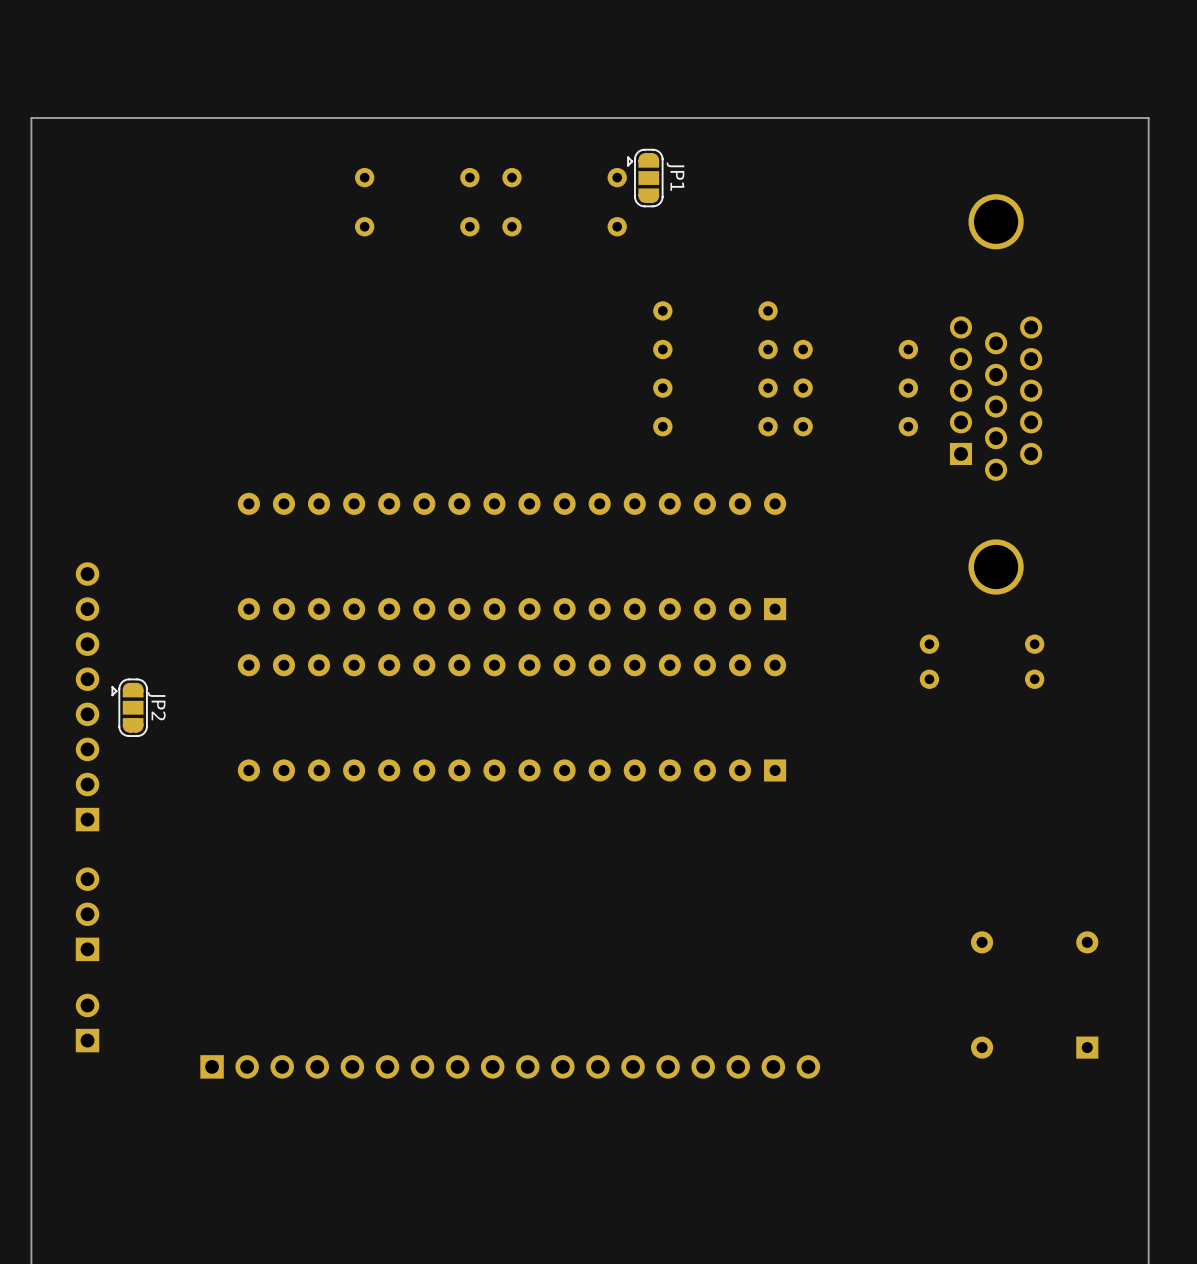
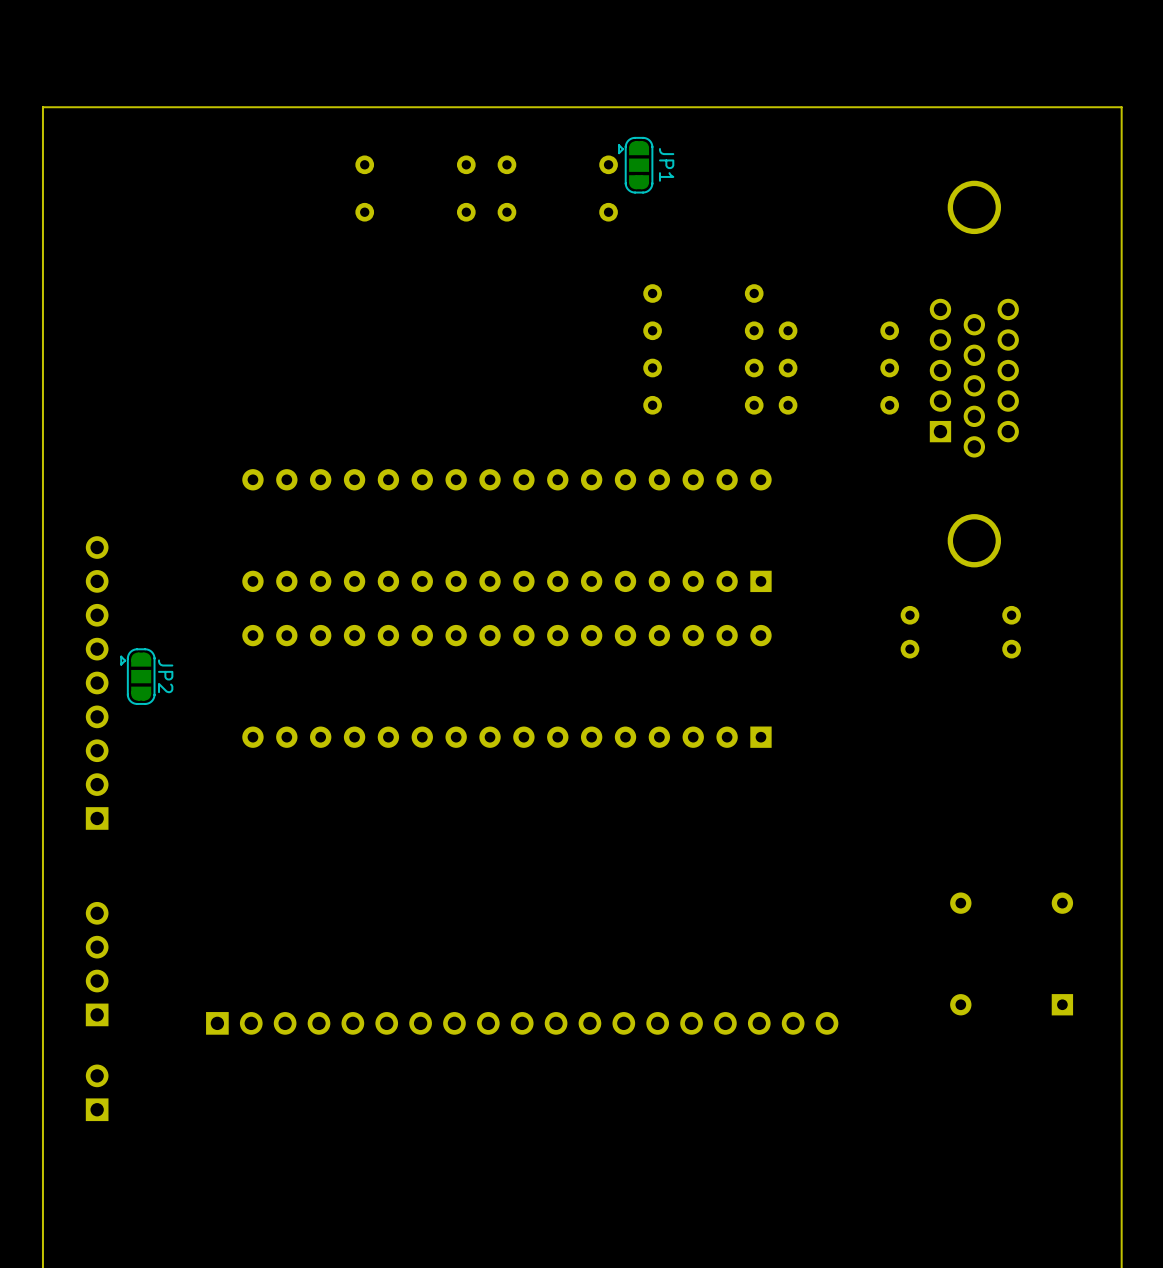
part: (87, 696) -> none
part: none -> (97, 682)
part: (87, 914) -> none
part: none -> (97, 964)
part position: (87, 1023) -> (97, 1092)
part: none -> (522, 1023)

